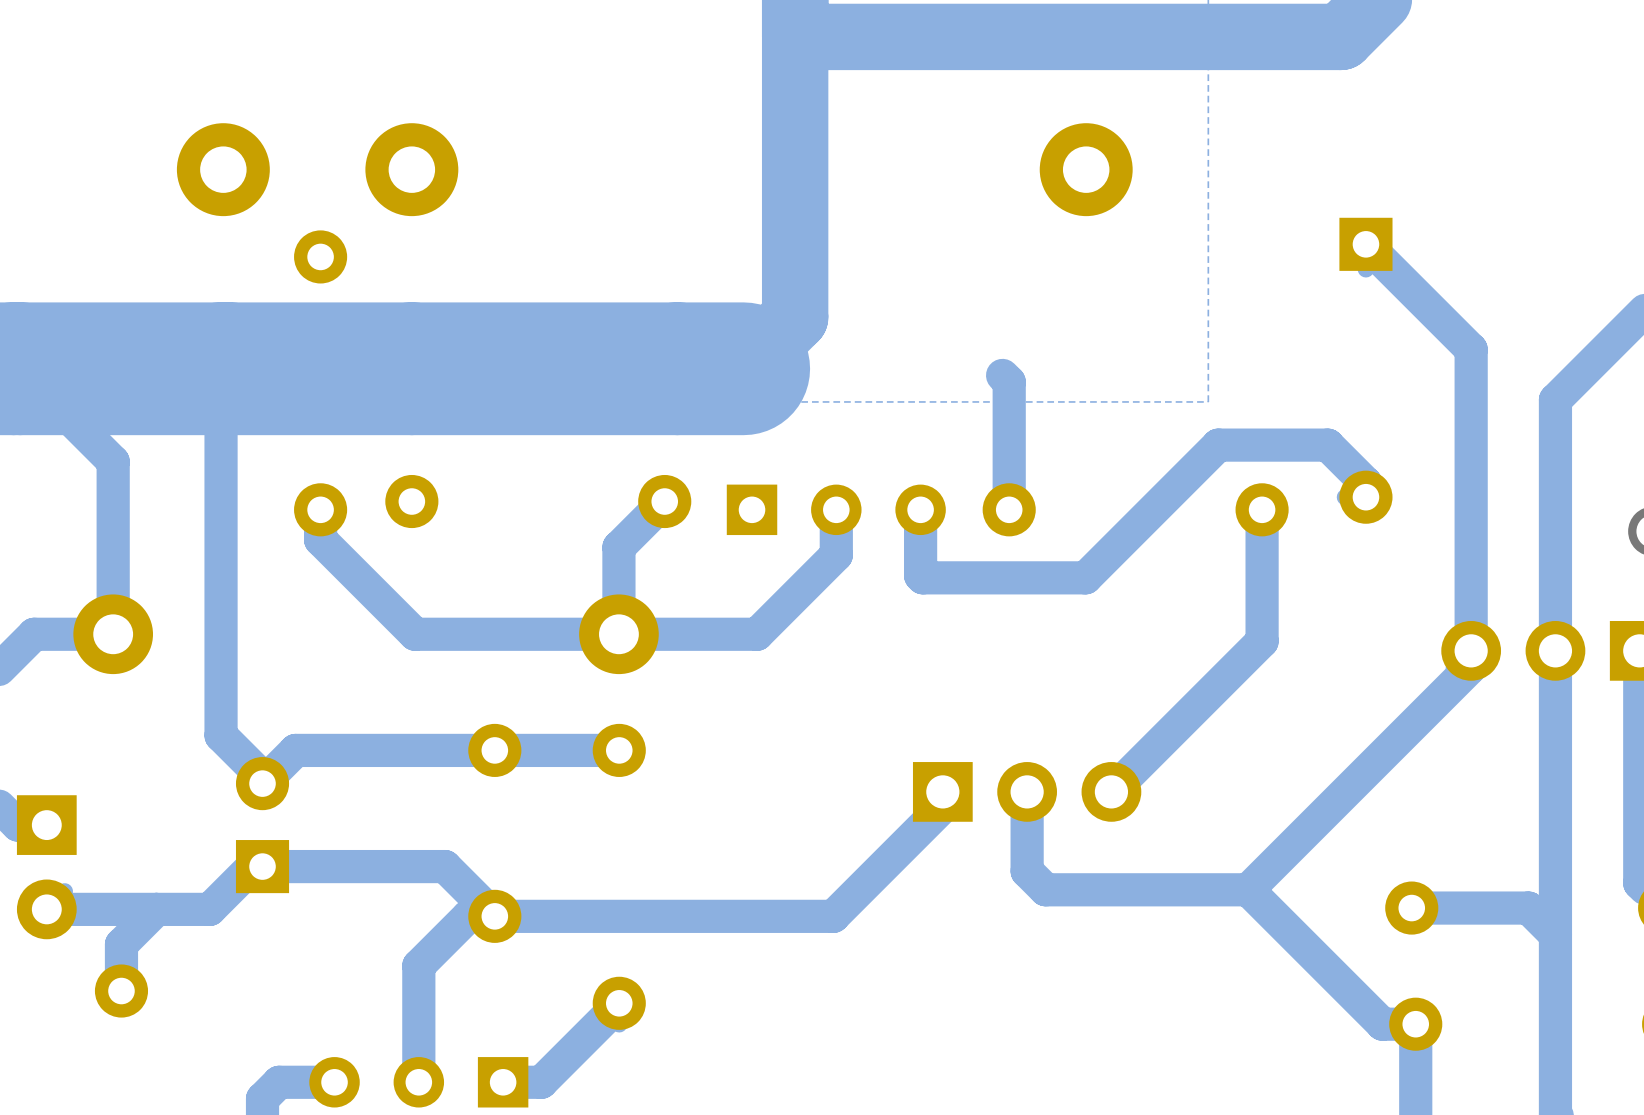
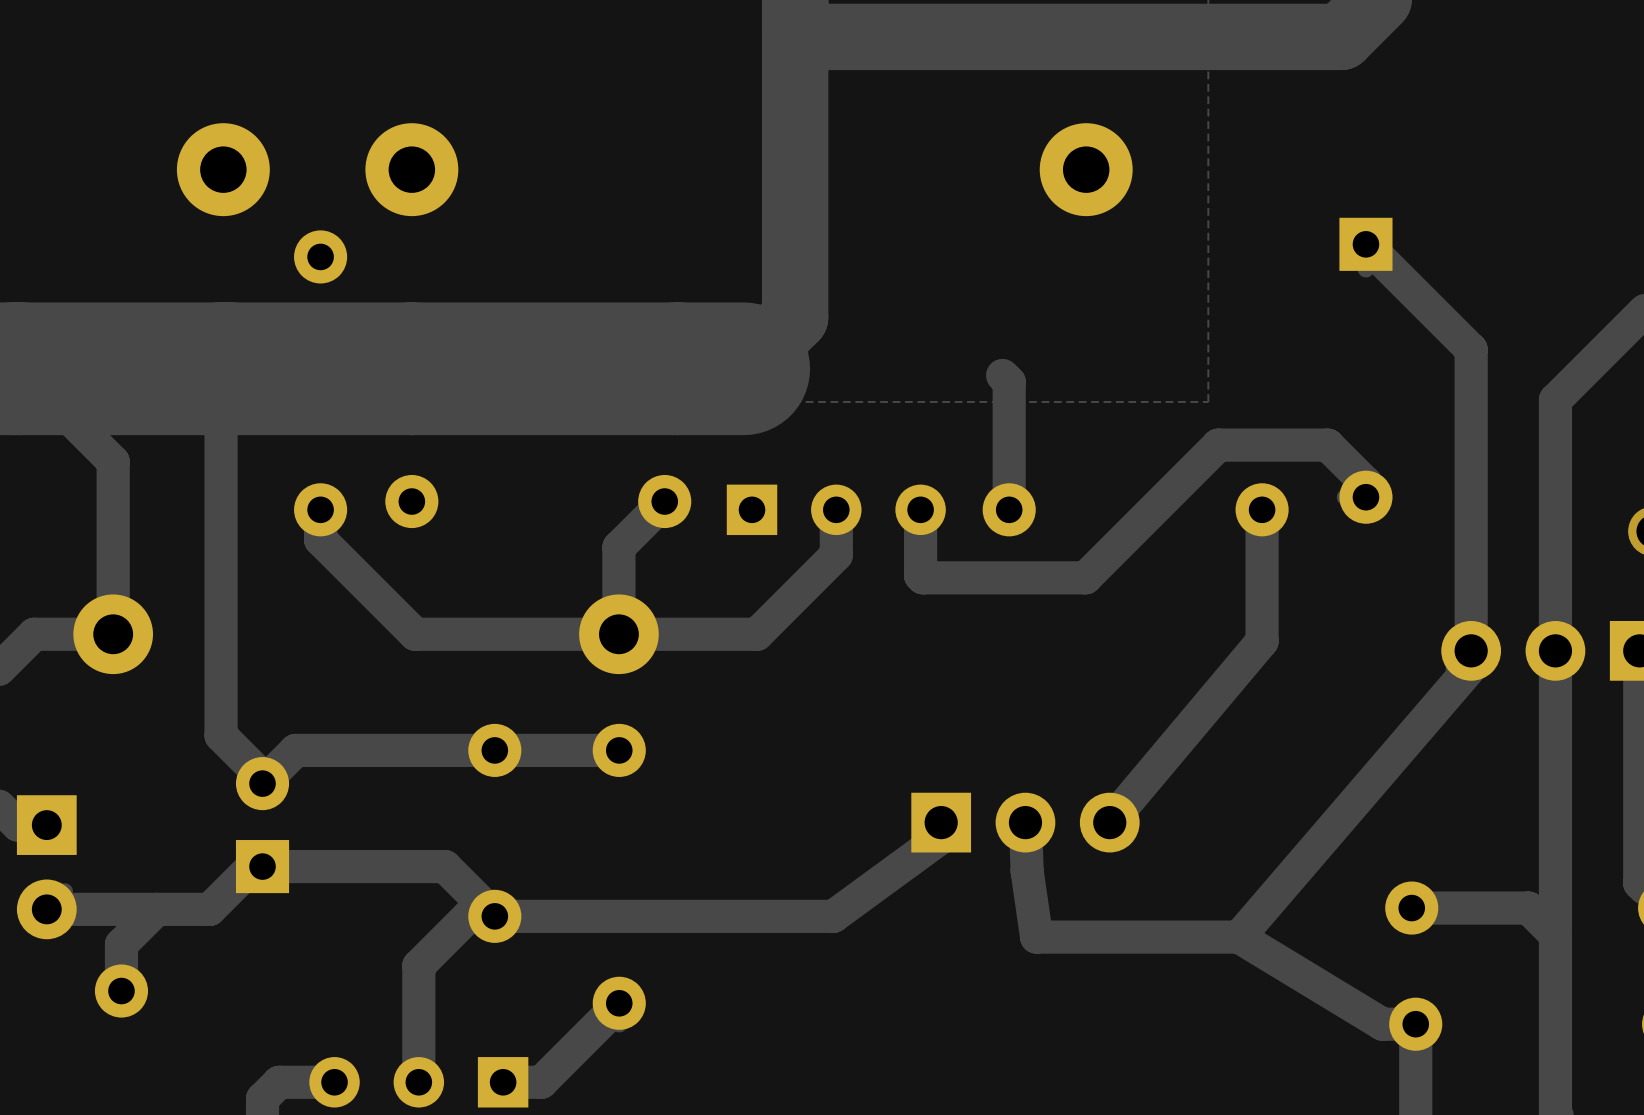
track: (1262, 641) (1111, 791) (1111, 794) -> (1262, 641) (1109, 822) (1109, 825)
track: (1471, 666) (1248, 889) -> (1471, 666) (1239, 937)
part position: (1027, 791) -> (1025, 822)
track: (942, 808) (942, 791) (942, 806) (833, 916) -> (941, 839) (941, 822) (941, 837) (833, 916)
track: (1027, 818) (1027, 791) (1027, 871) (1045, 889) (1248, 889) -> none
track: none -> (1025, 848) (1025, 822) (1027, 871) (1036, 937) (1239, 937)
track: (1248, 889) (1382, 1024) -> (1239, 937) (1382, 1024)

